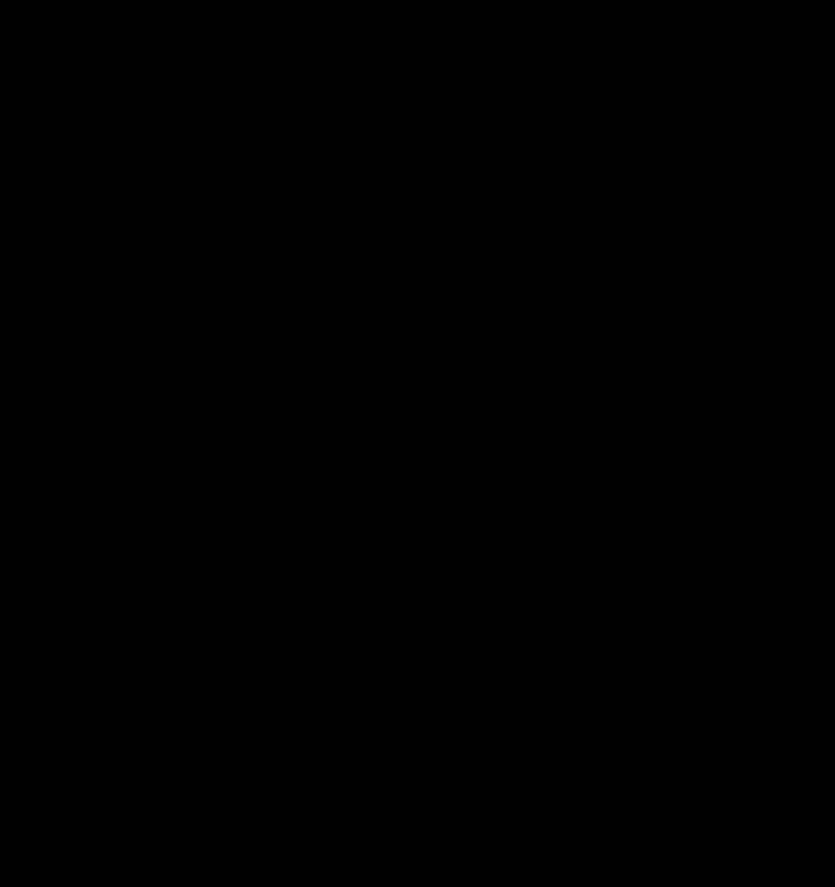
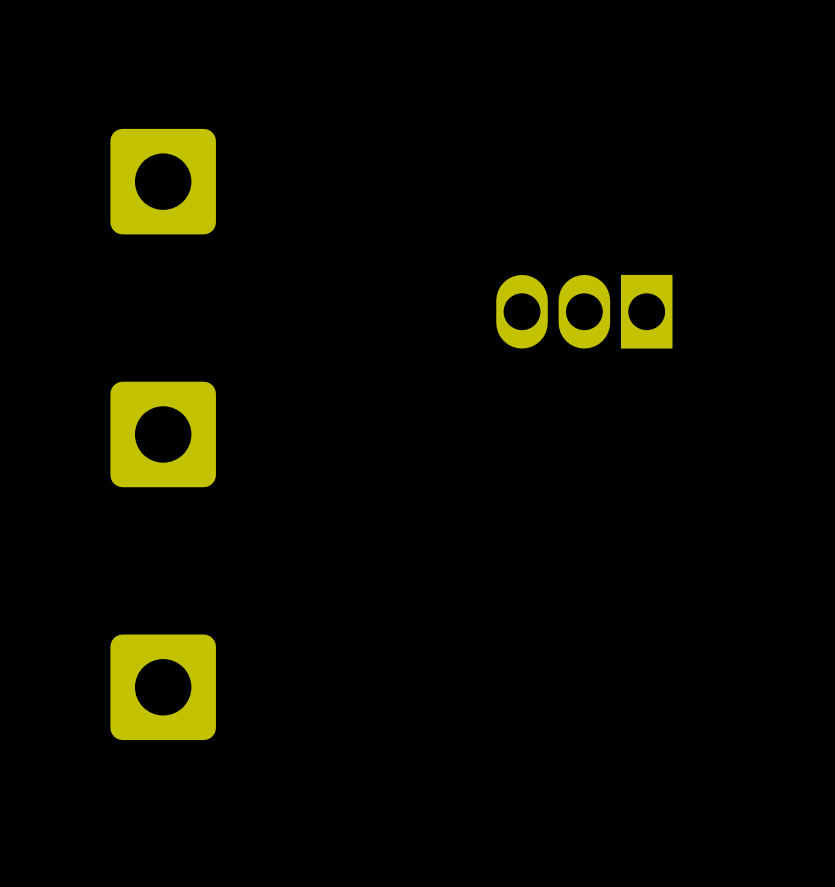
part: none -> (163, 181)
part: none -> (584, 311)
part: none -> (163, 434)
part: none -> (163, 687)

